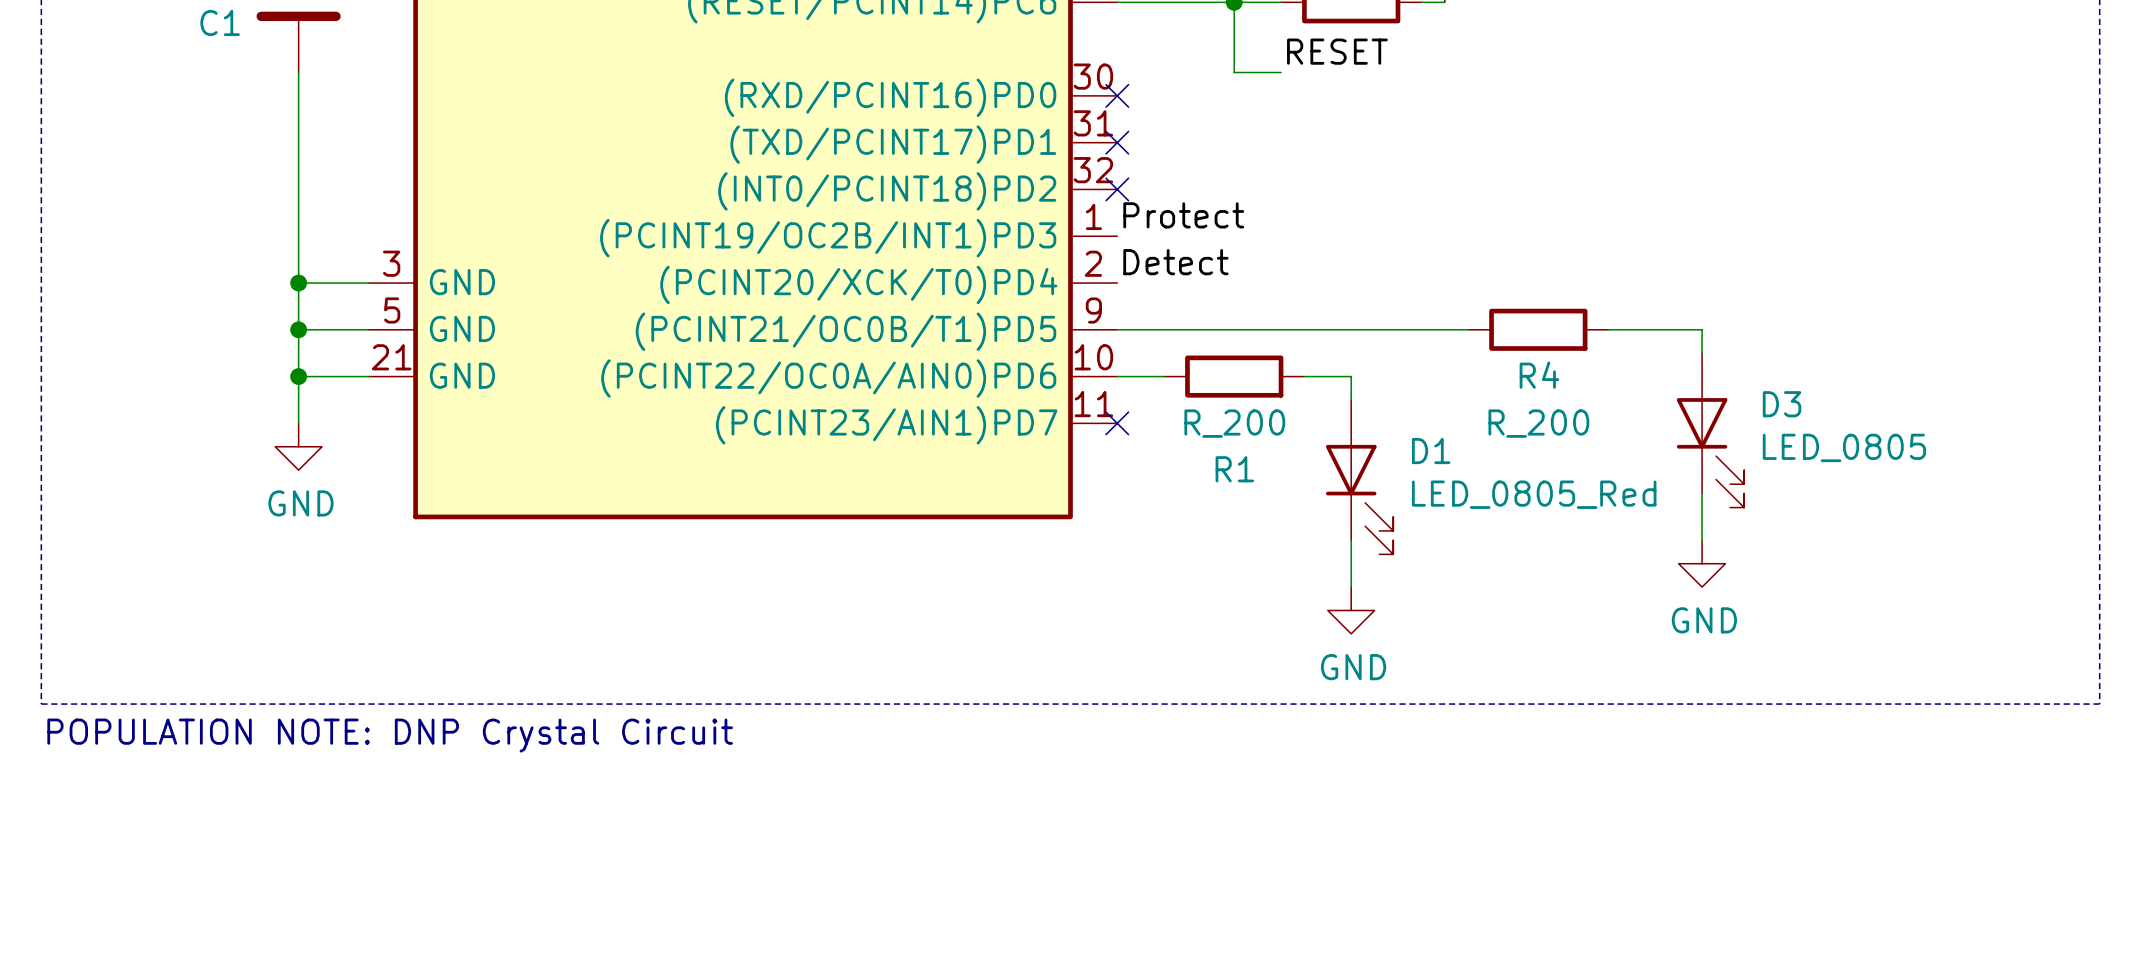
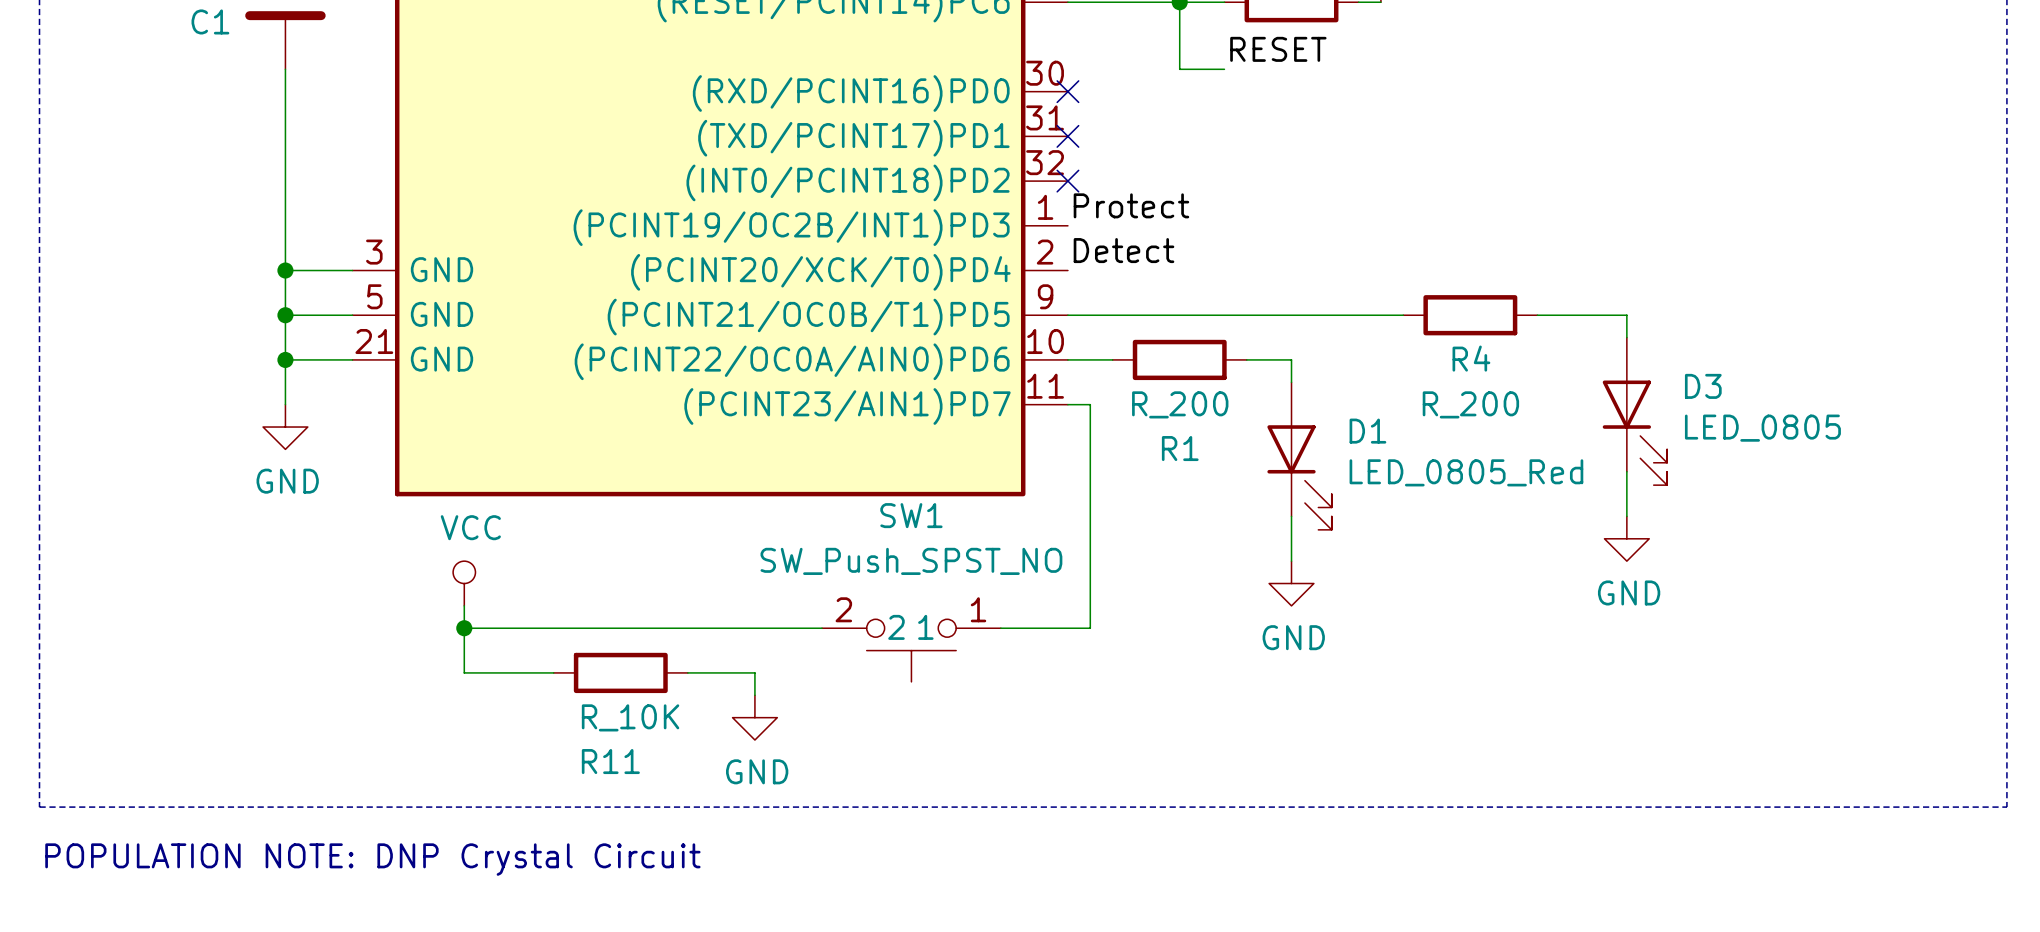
wire: none -> (1067, 404) (1090, 404) (1090, 628) (1000, 628)
no-connect mark: (1117, 423) -> none
power symbol: none -> VCC (464, 583)
wire: none -> (464, 605) (464, 672) (553, 672)
wire: none -> (464, 628) (822, 628)
junction: none -> (464, 628)
SW1: none -> SW_Push_SPST_NO (911, 650)
line: (41, 704) (2099, 704) -> (39, 672) (39, 807) (2006, 807) (2006, 672)
R11: none -> R_10K (620, 672)
wire: none -> (687, 672) (754, 672) (754, 695)
text position: POPULATION NOTE: DNP Crystal Circuit (390, 735) -> POPULATION NOTE: DNP Crystal Circuit (372, 859)
power symbol: none -> GND (754, 717)

